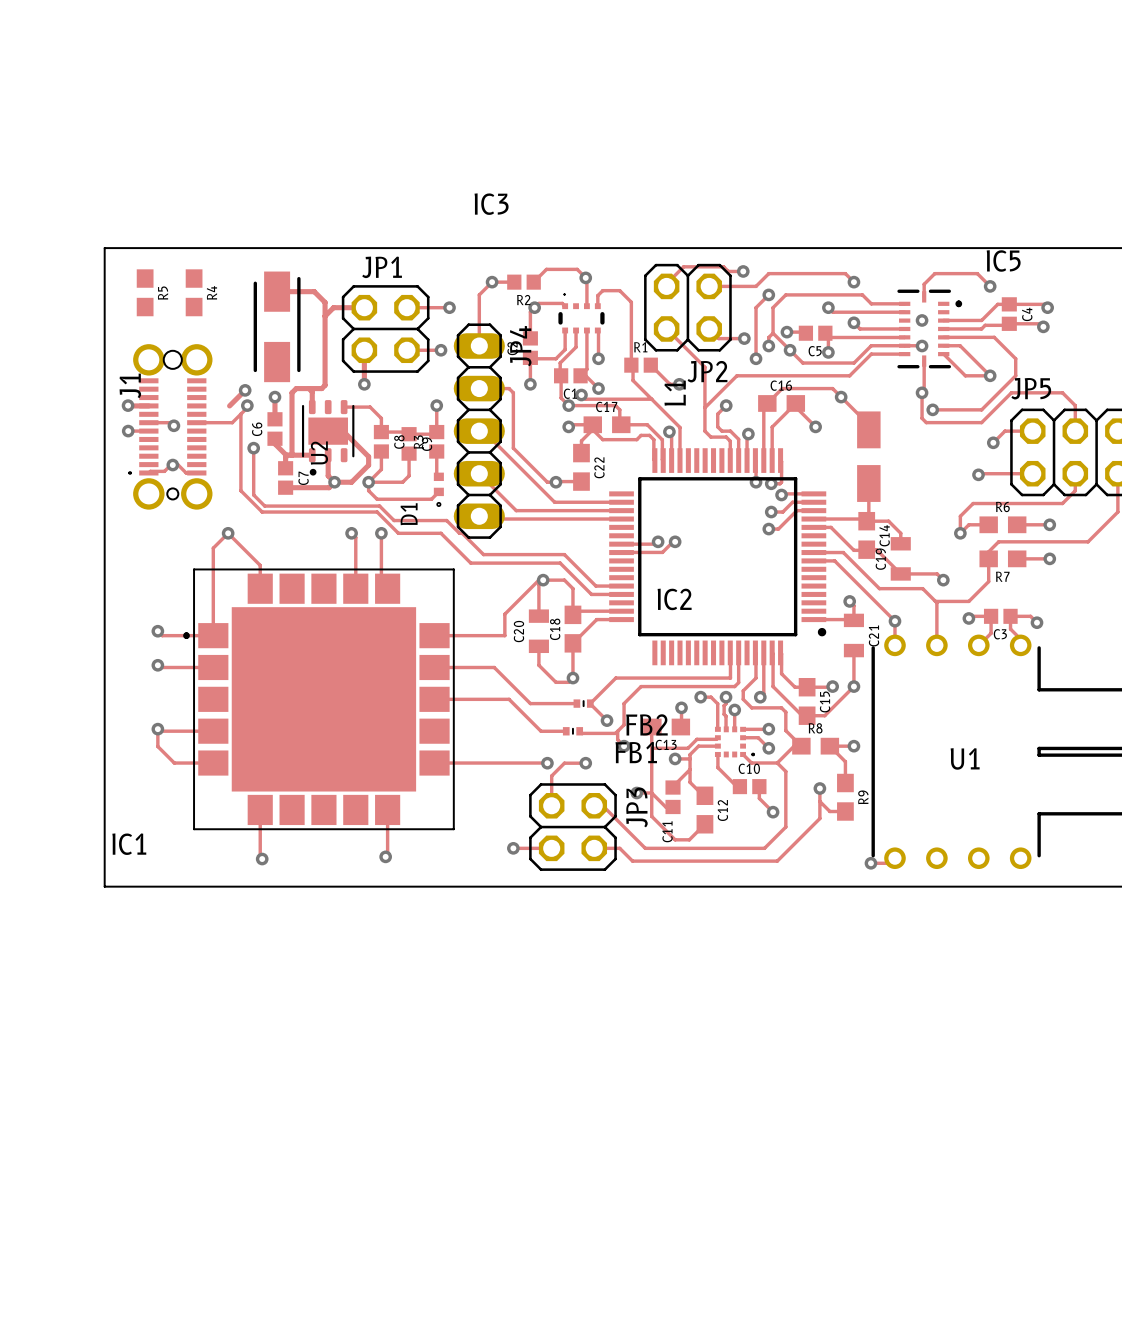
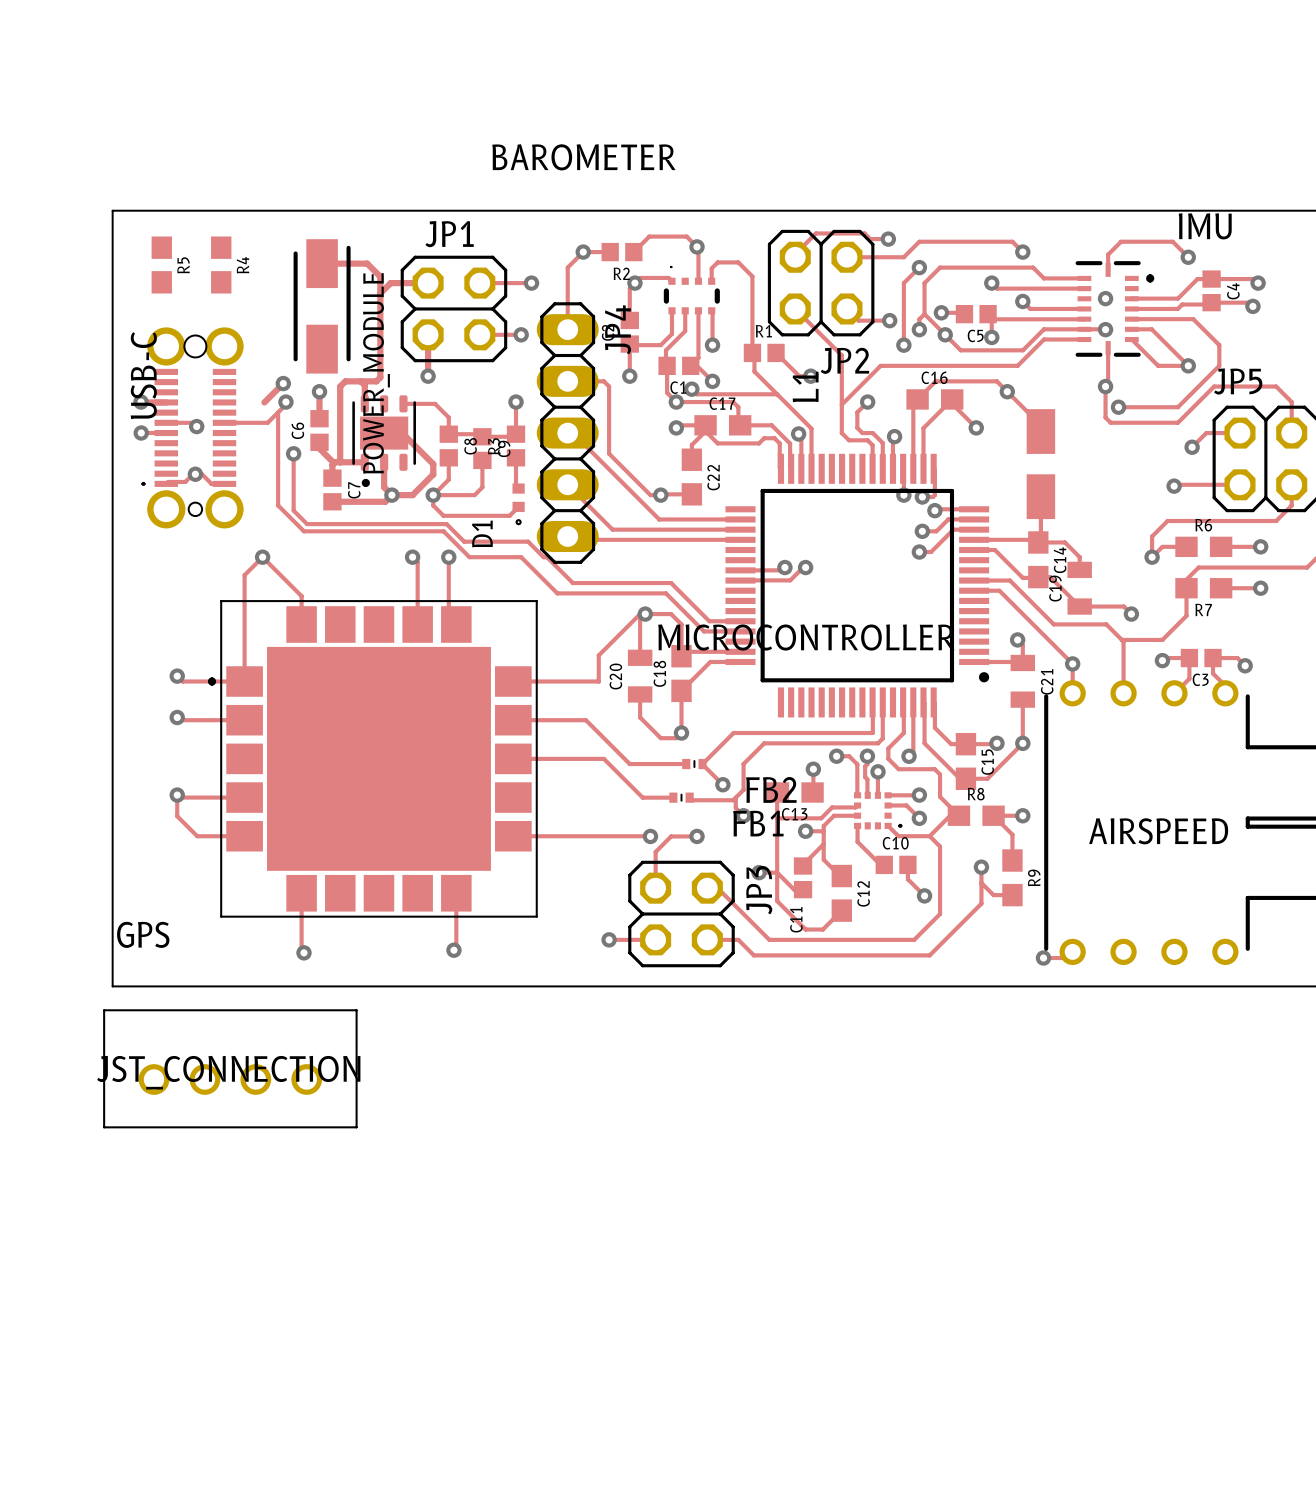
IC3 name: IC3 (491, 204) -> BAROMETER (583, 157)
IC5 name: IC5 (1003, 260) -> IMU (1205, 226)
J1 name: J1 (130, 385) -> USB-C (143, 375)
U2 name: U2 (319, 453) -> POWER_MODULE (376, 373)
IC2 name: IC2 (674, 599) -> MICROCONTROLLER (806, 637)
U1 name: U1 (965, 758) -> AIRSPEED (1158, 831)
IC1 name: IC1 (129, 844) -> GPS (143, 934)
JST_CONNECTION: none -> (230, 1068)

